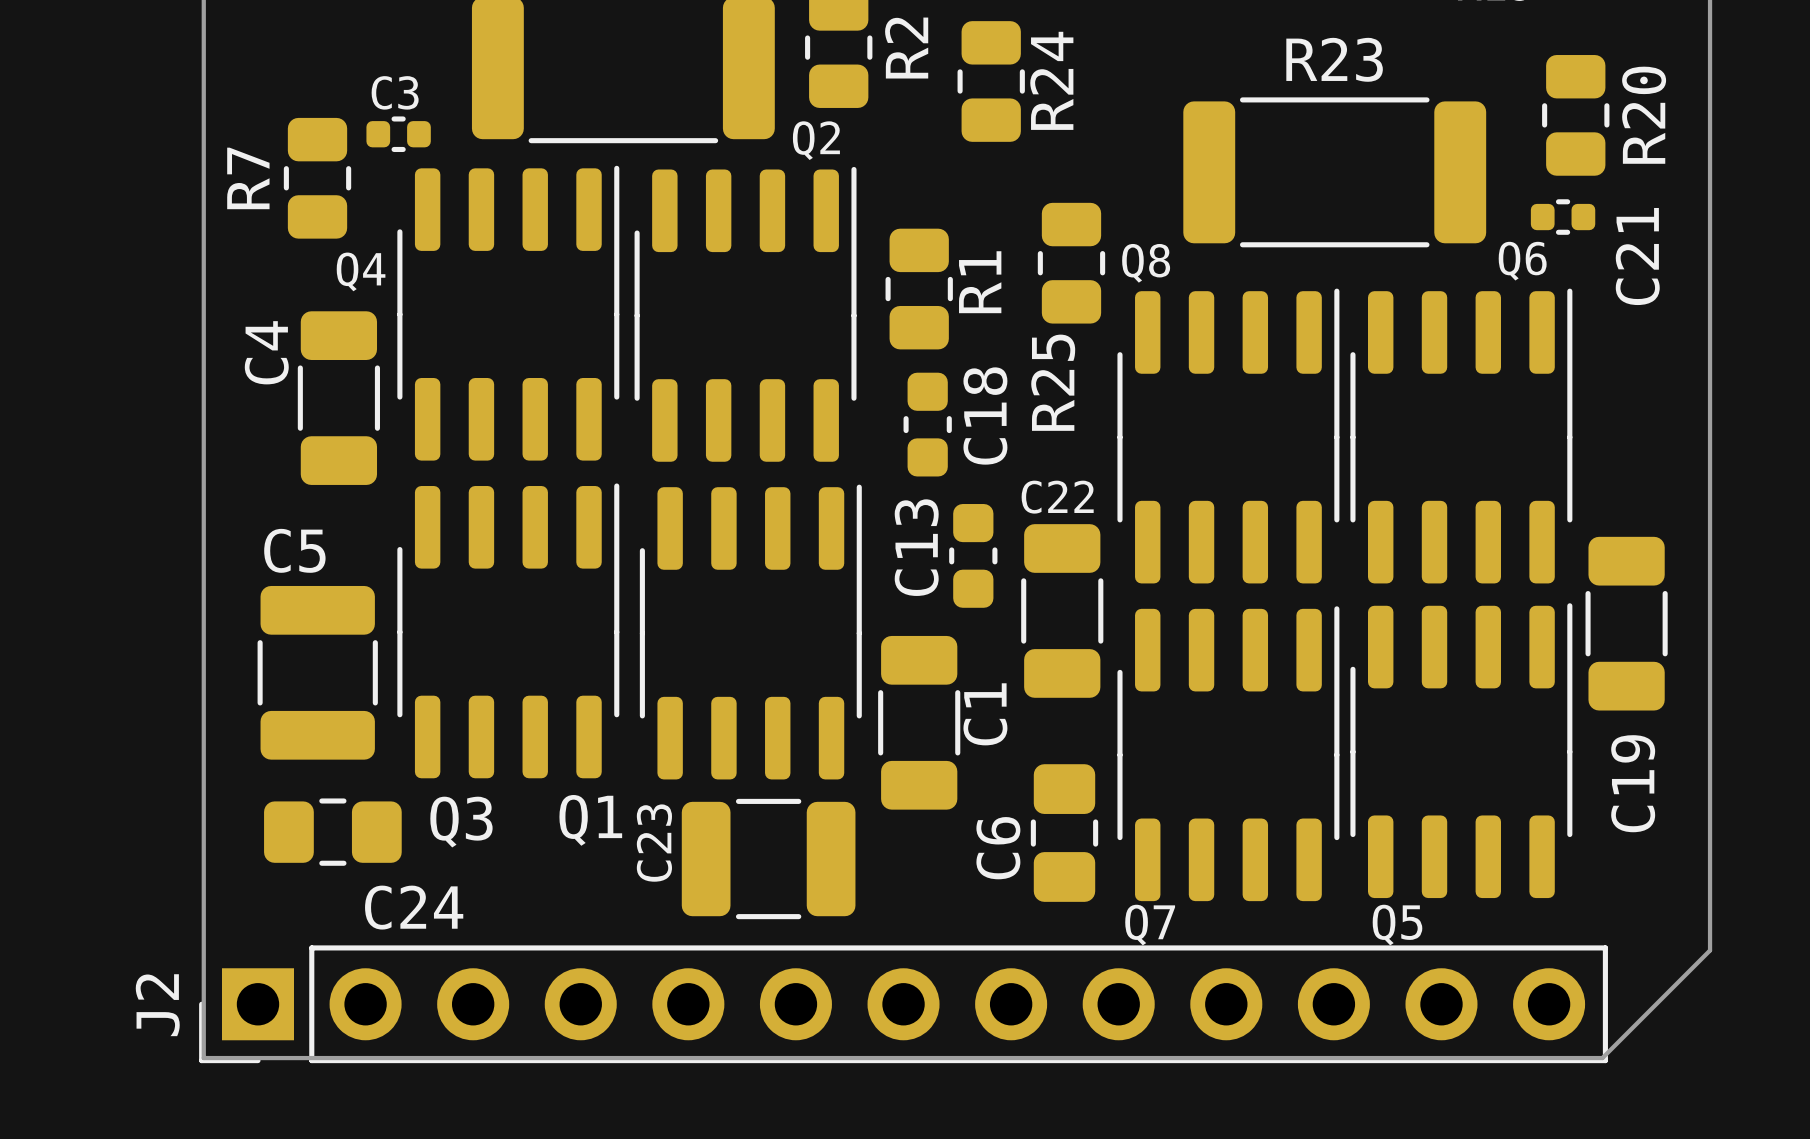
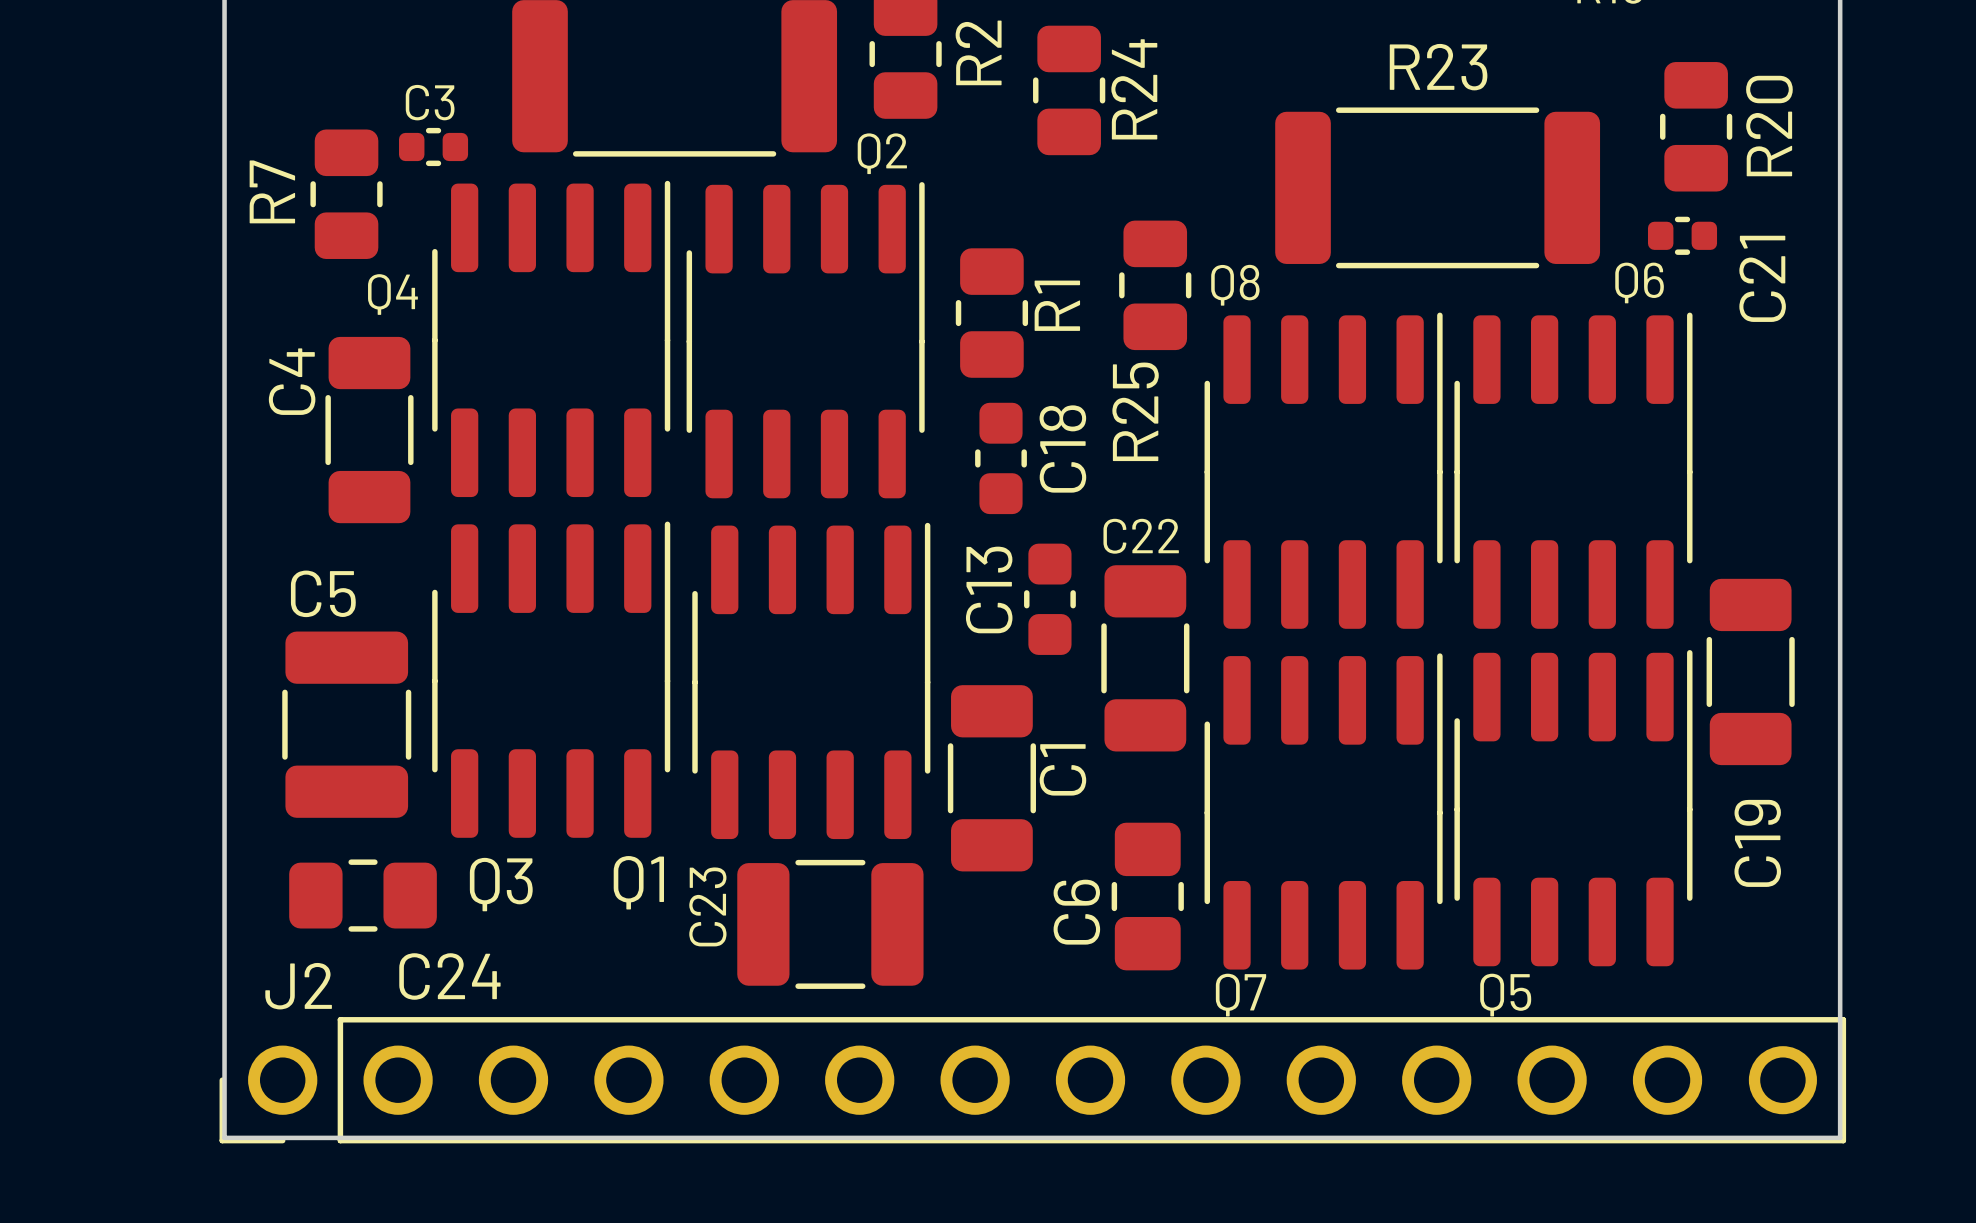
J2 footprint: [199, 945, 1608, 1064] -> [219, 1017, 1847, 1144]
board edge: (1710, 950) (1602, 1058) -> (1840, 1022) (1840, 1137) (1724, 1137)
J2 name position: J2 (157, 1005) -> J2 (298, 986)

